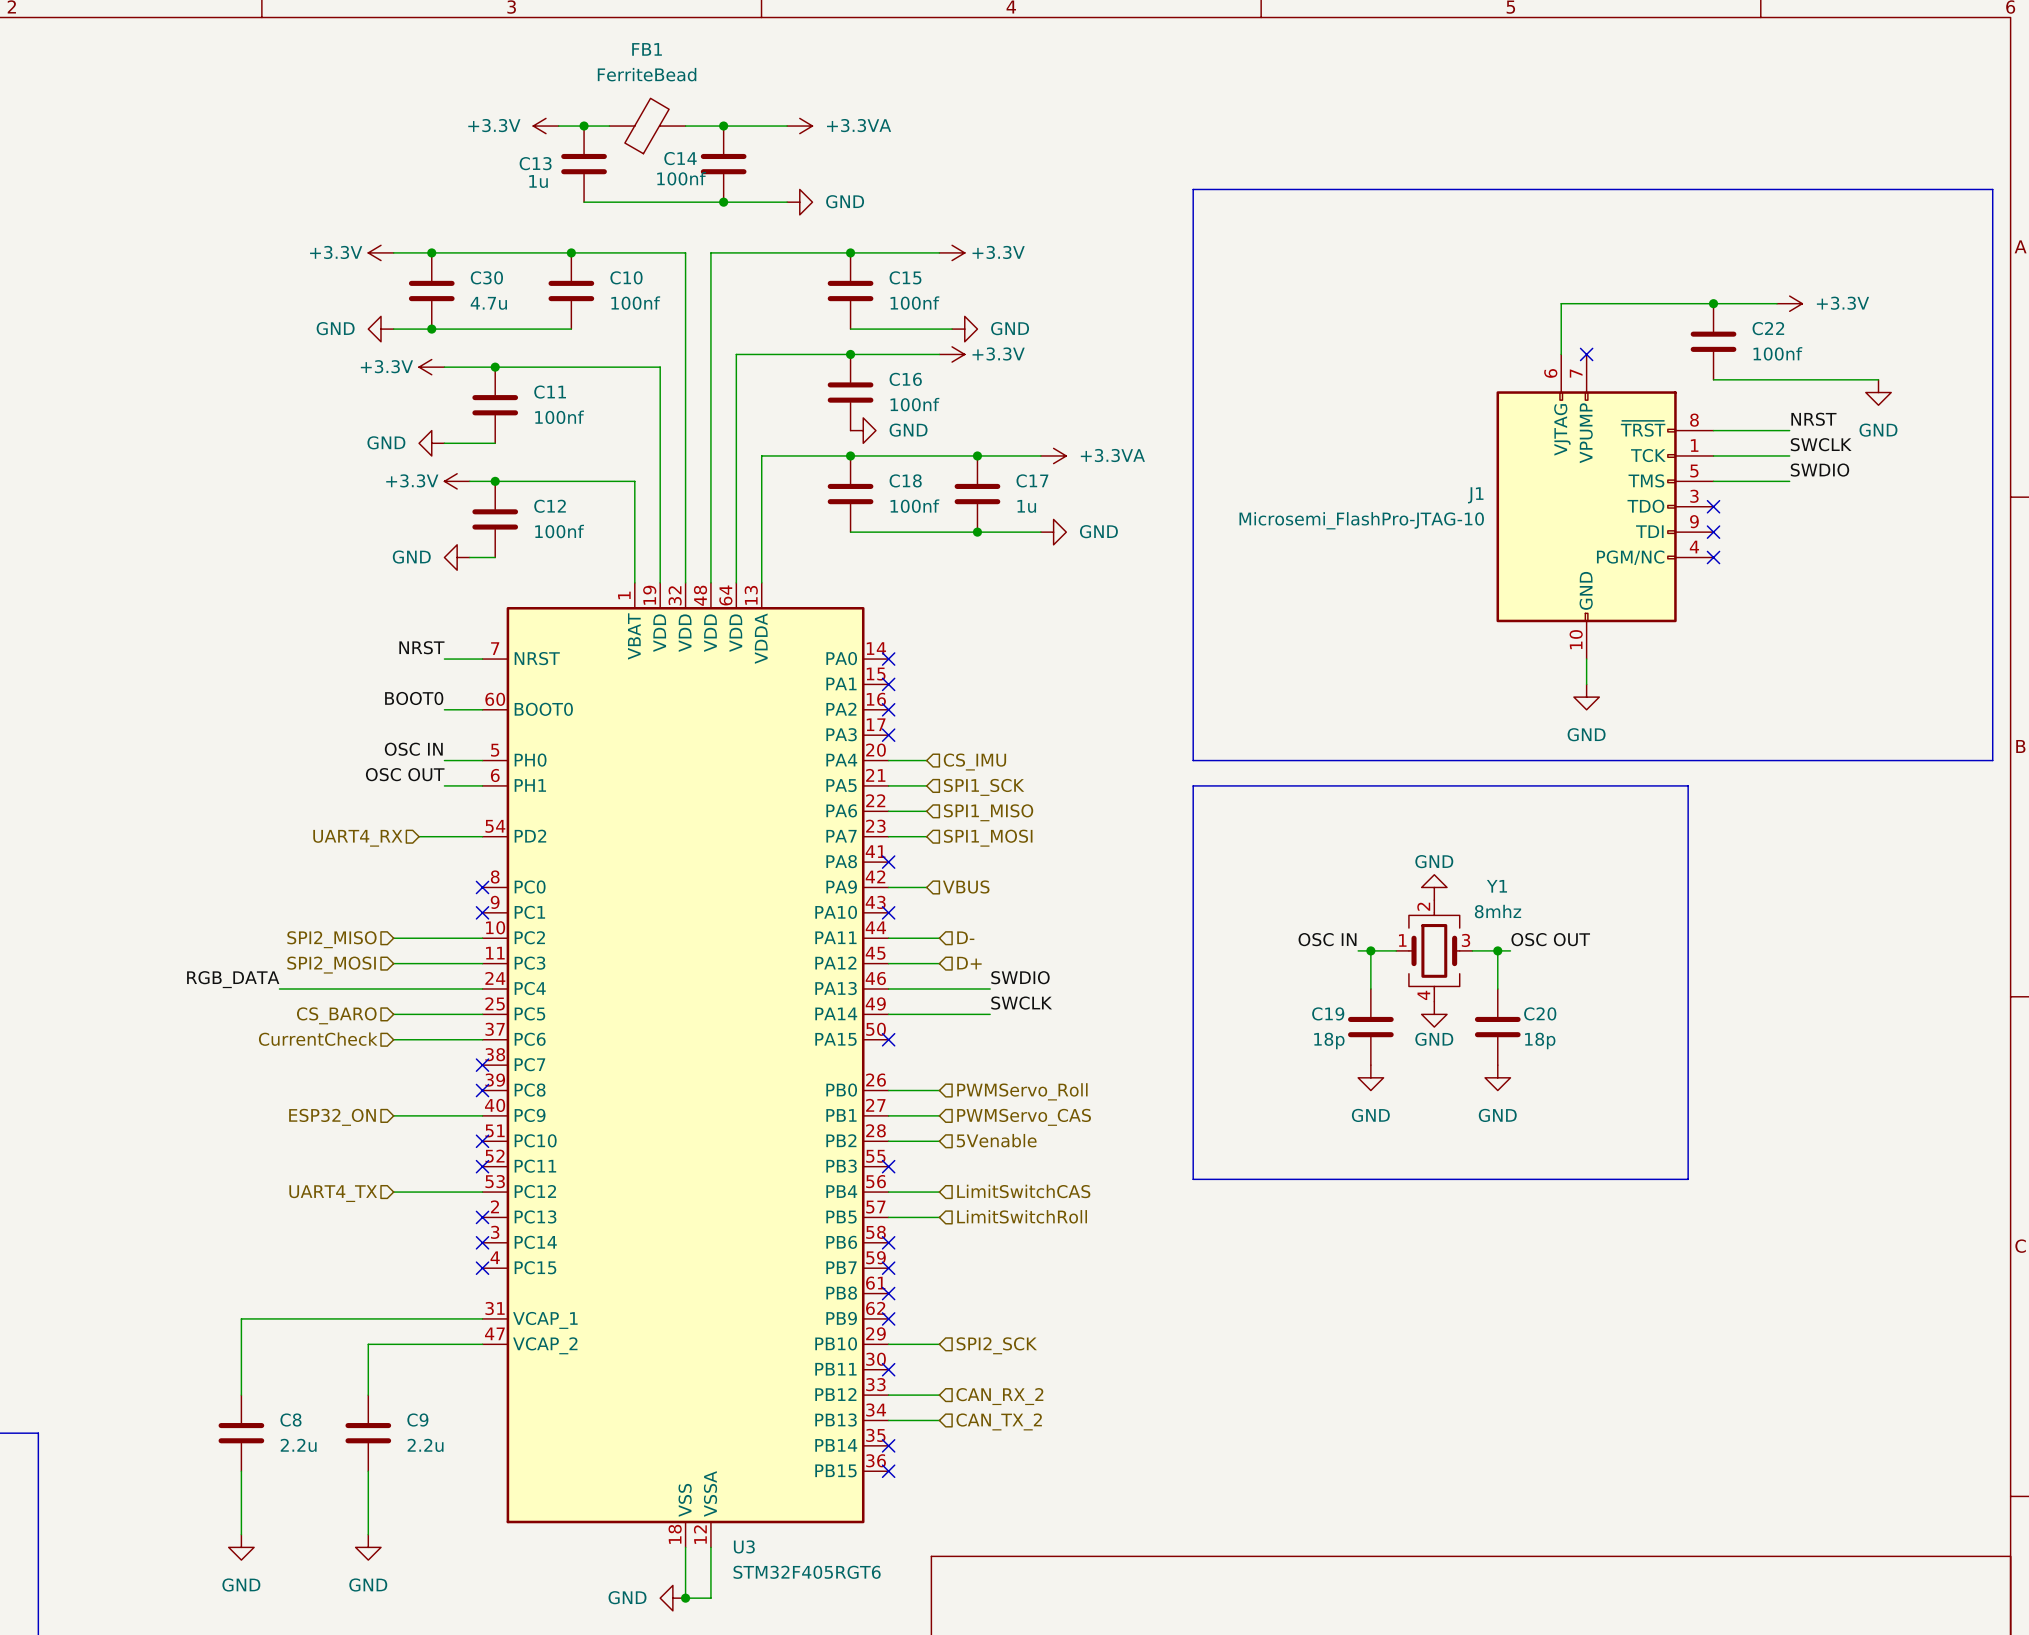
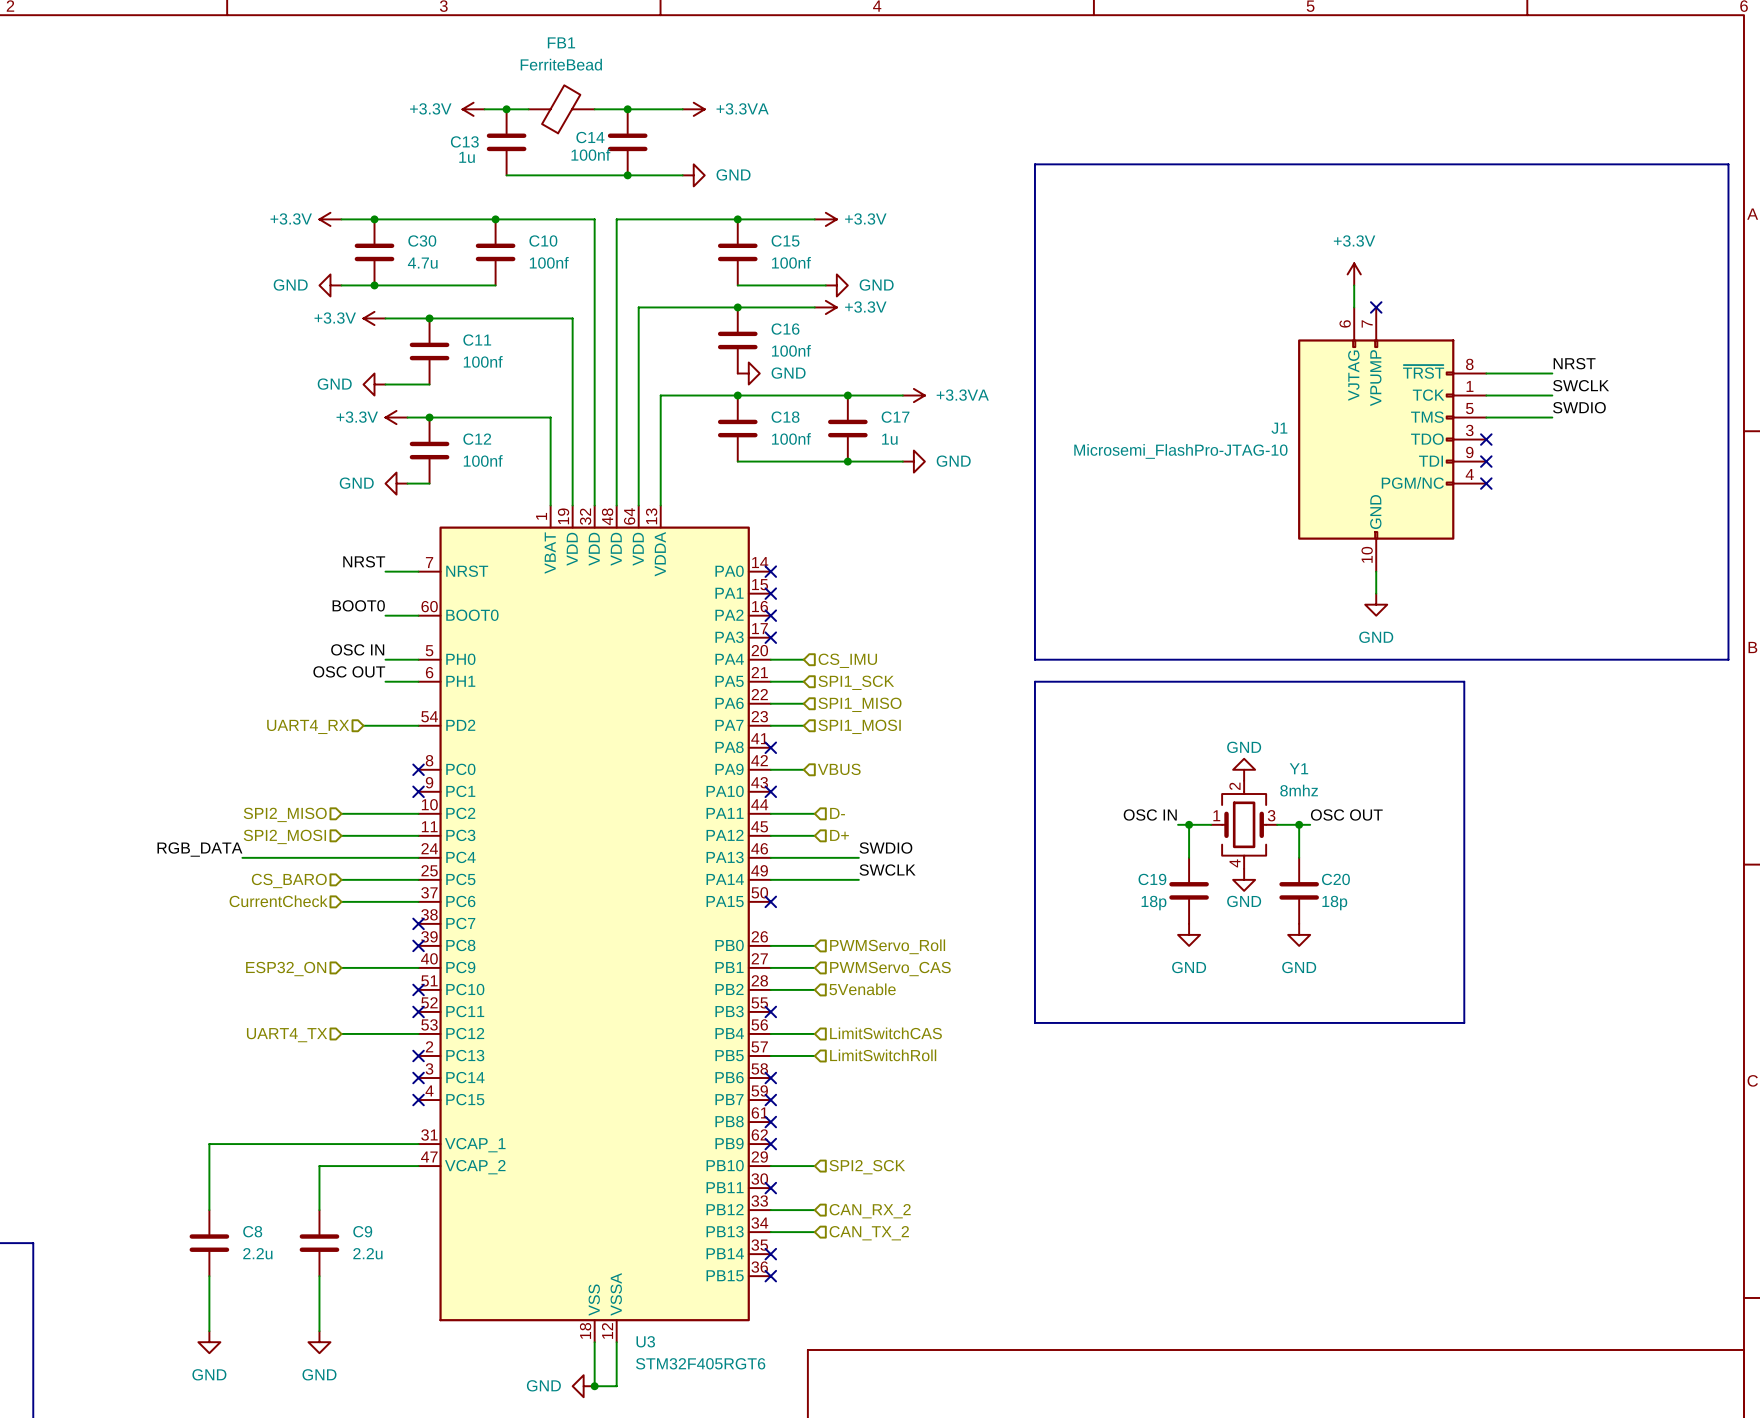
junction: (1713, 303) -> none
wire: (1776, 303) (1561, 303) (1561, 329) -> none
power symbol rotation: 0° (1789, 303) -> 90° counterclockwise (1354, 274)
power symbol position: +3.3V (1789, 303) -> +3.3V (1354, 274)
power symbol text position: +3.3V (1842, 303) -> +3.3V (1354, 240)
C22: 100nf (1713, 341) -> none
wire: (1713, 379) (1878, 379) -> none
power symbol: GND (1878, 392) -> none

